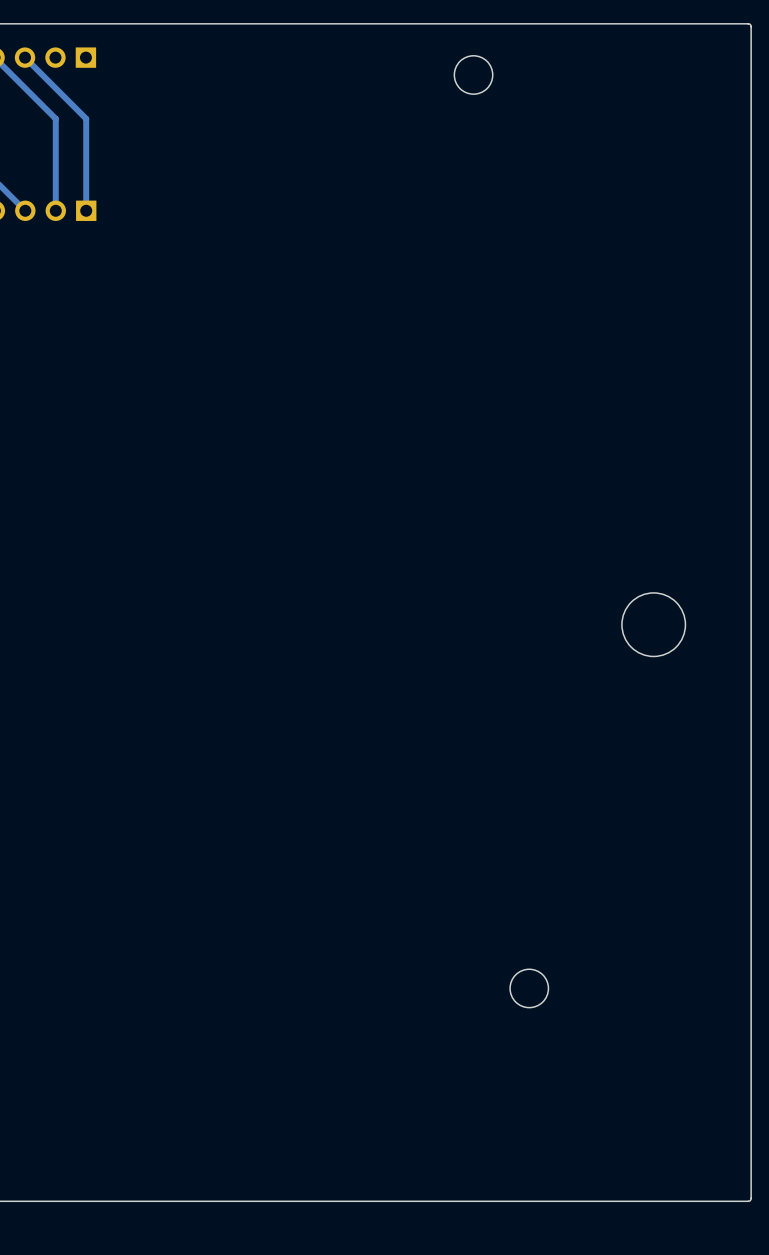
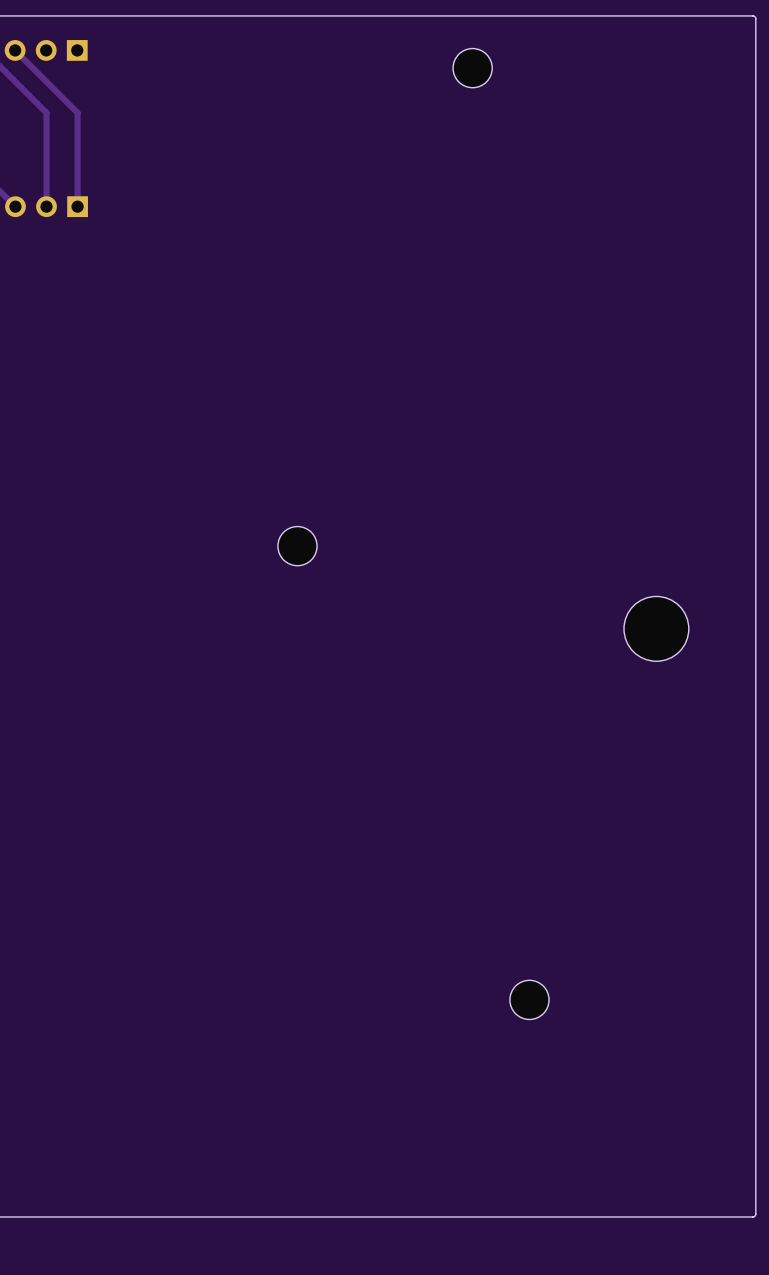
part: none -> (297, 546)

